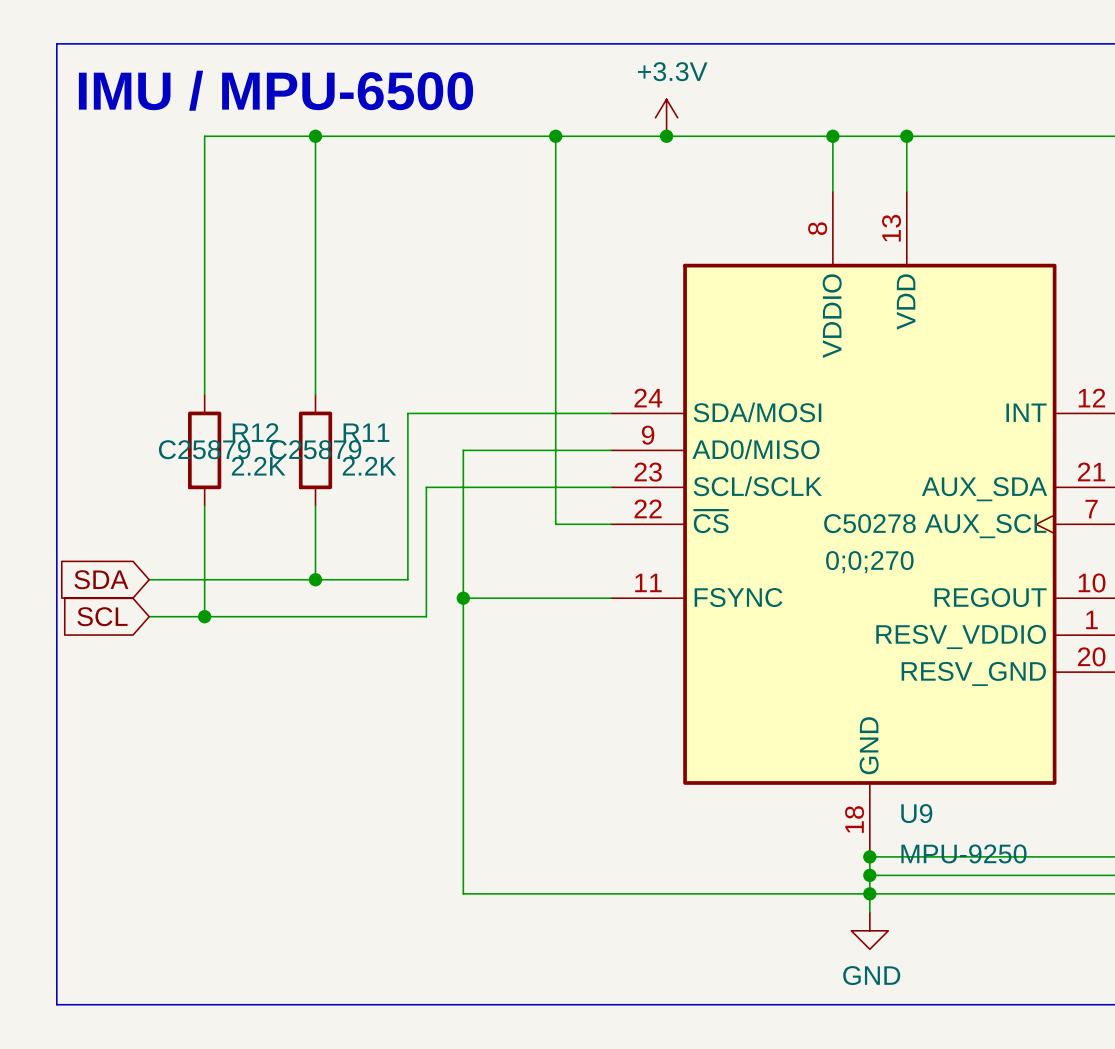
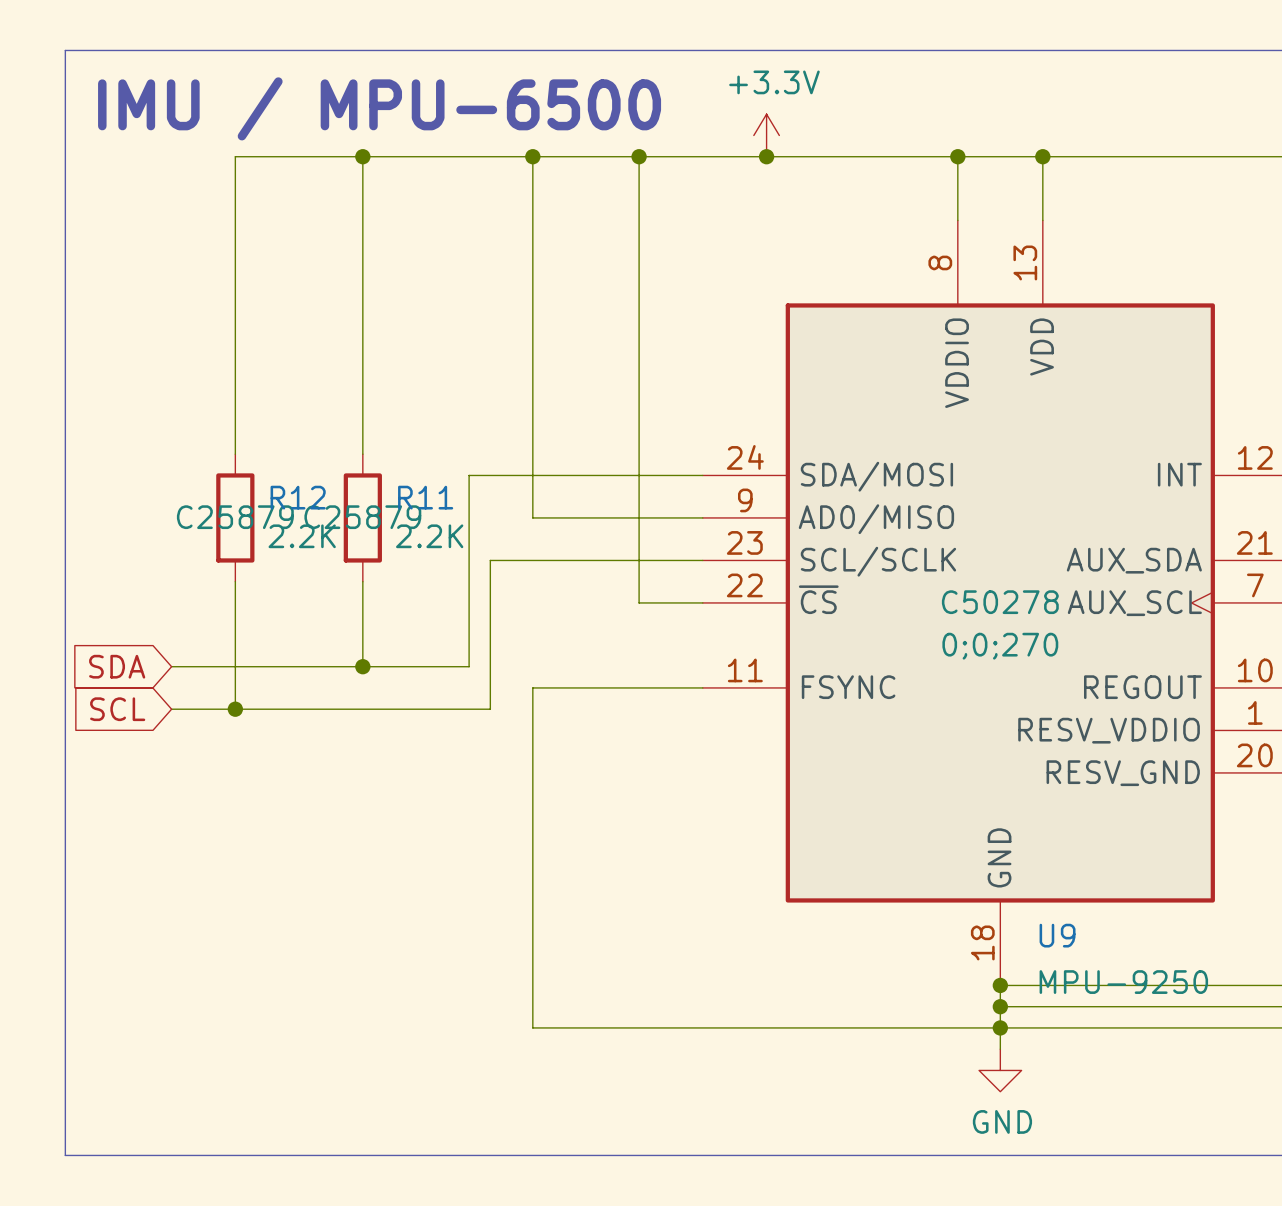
junction: none -> (532, 156)
wire: (463, 450) (463, 598) -> (532, 517) (532, 156)
junction: (463, 598) -> none

